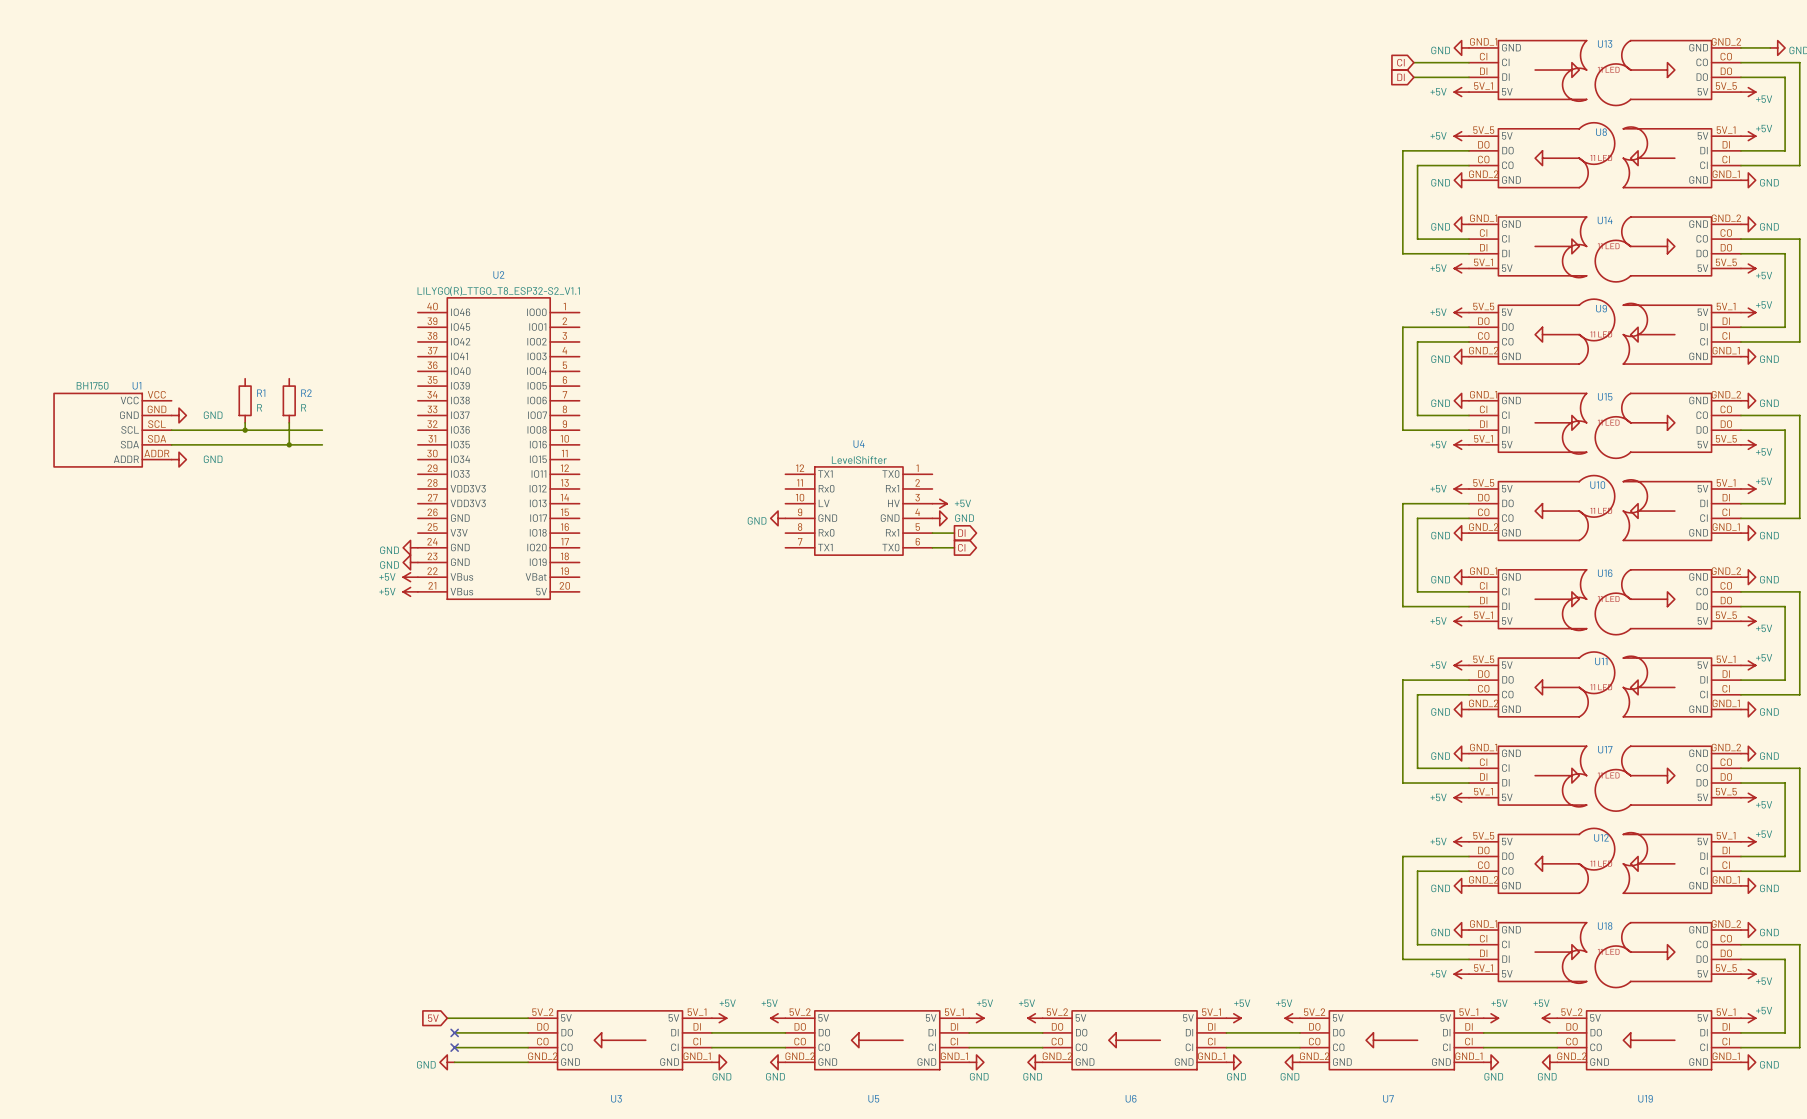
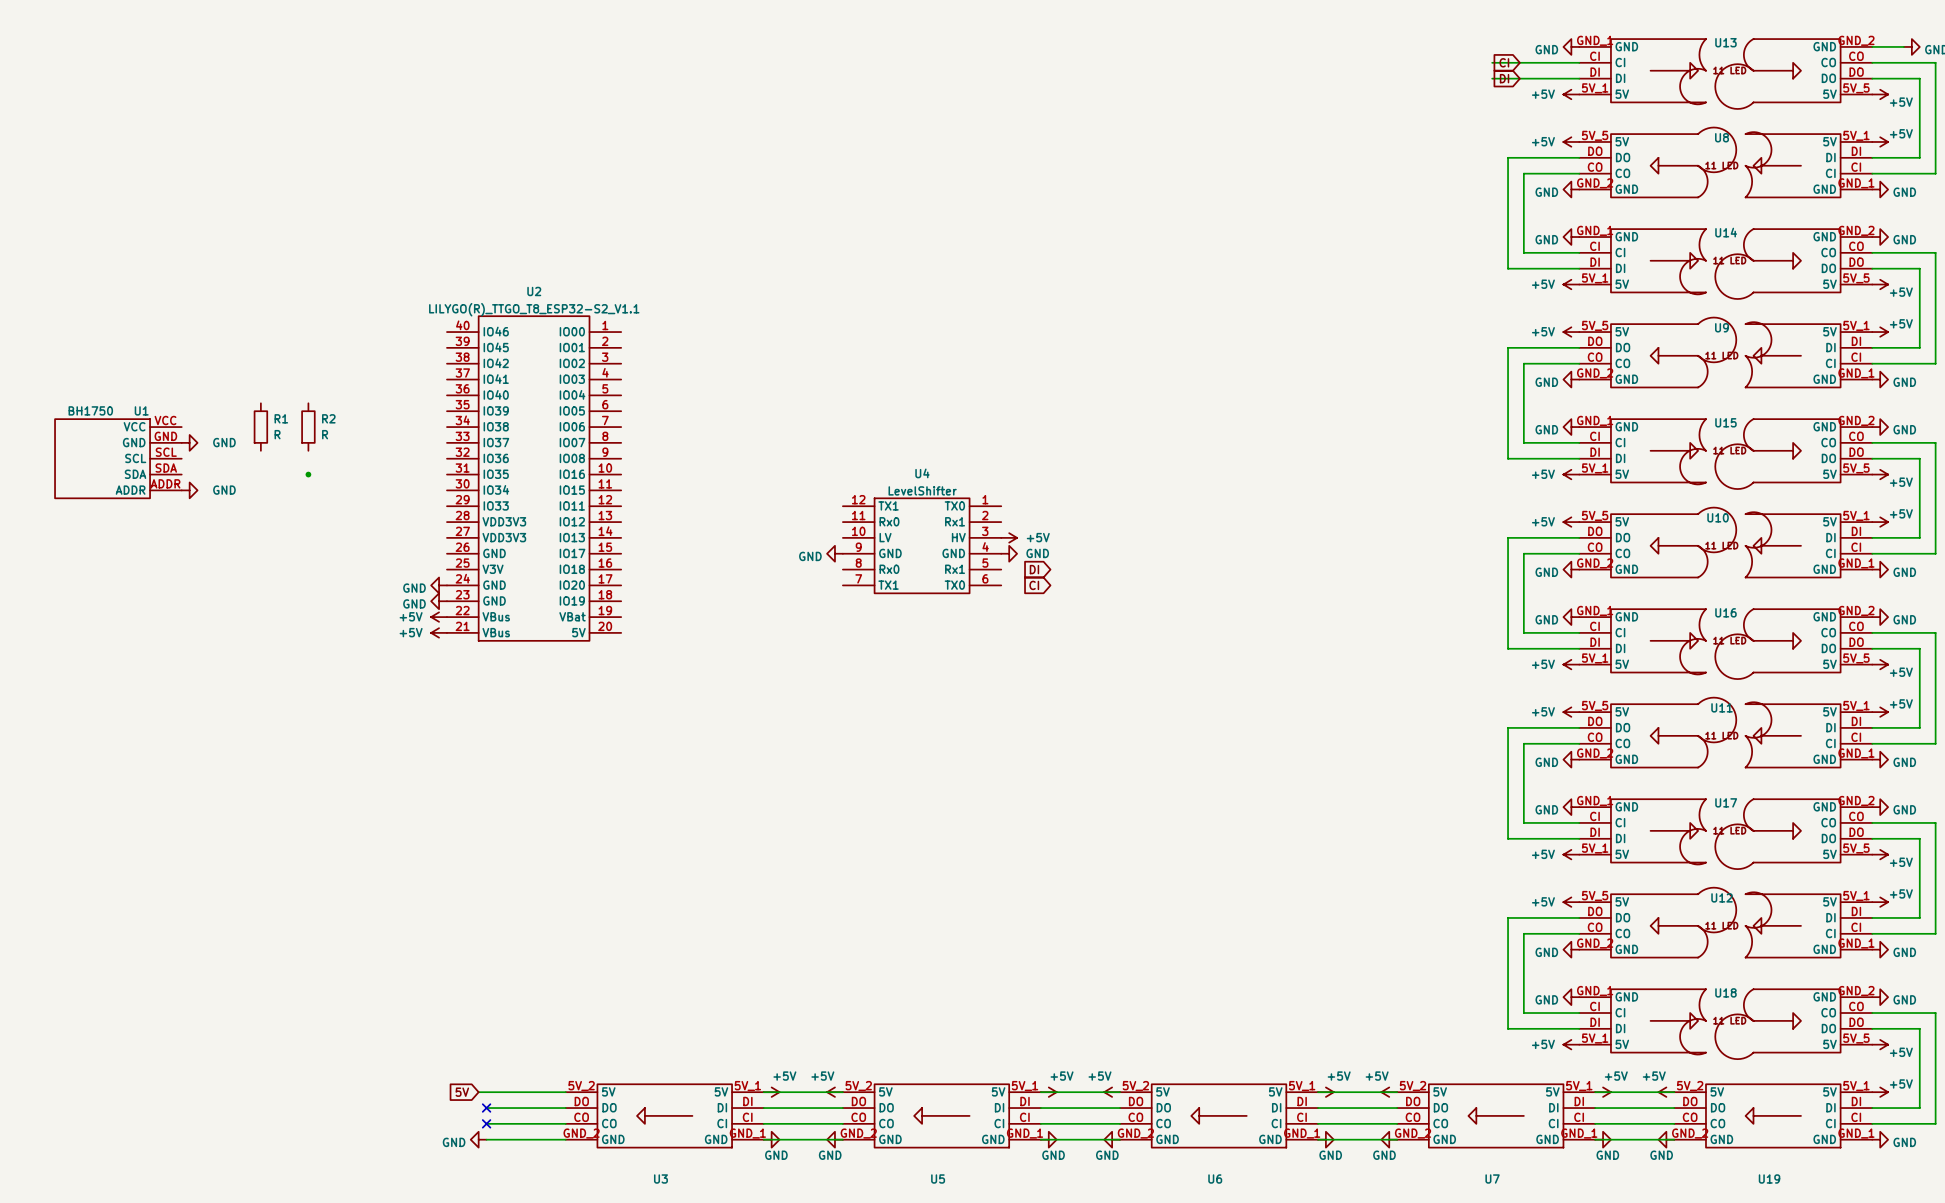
wire: none -> (1492, 62) (1519, 62)
wire: none -> (1492, 78) (1519, 78)
wire: (245, 422) (245, 430) -> none
wire: (289, 422) (289, 444) -> none
wire: (171, 430) (322, 430) -> none
junction: (245, 430) -> none
wire: (171, 444) (322, 444) -> none
wire: (932, 533) (954, 533) -> none
wire: (932, 547) (954, 547) -> none
wire: none -> (763, 1092) (842, 1092)
wire: none -> (1040, 1092) (1120, 1092)
wire: none -> (1317, 1092) (1397, 1092)
wire: none -> (1595, 1092) (1674, 1092)
wire: none -> (763, 1139) (842, 1139)
wire: none -> (1040, 1139) (1120, 1139)
wire: none -> (1317, 1139) (1397, 1139)
wire: none -> (1595, 1139) (1674, 1139)

